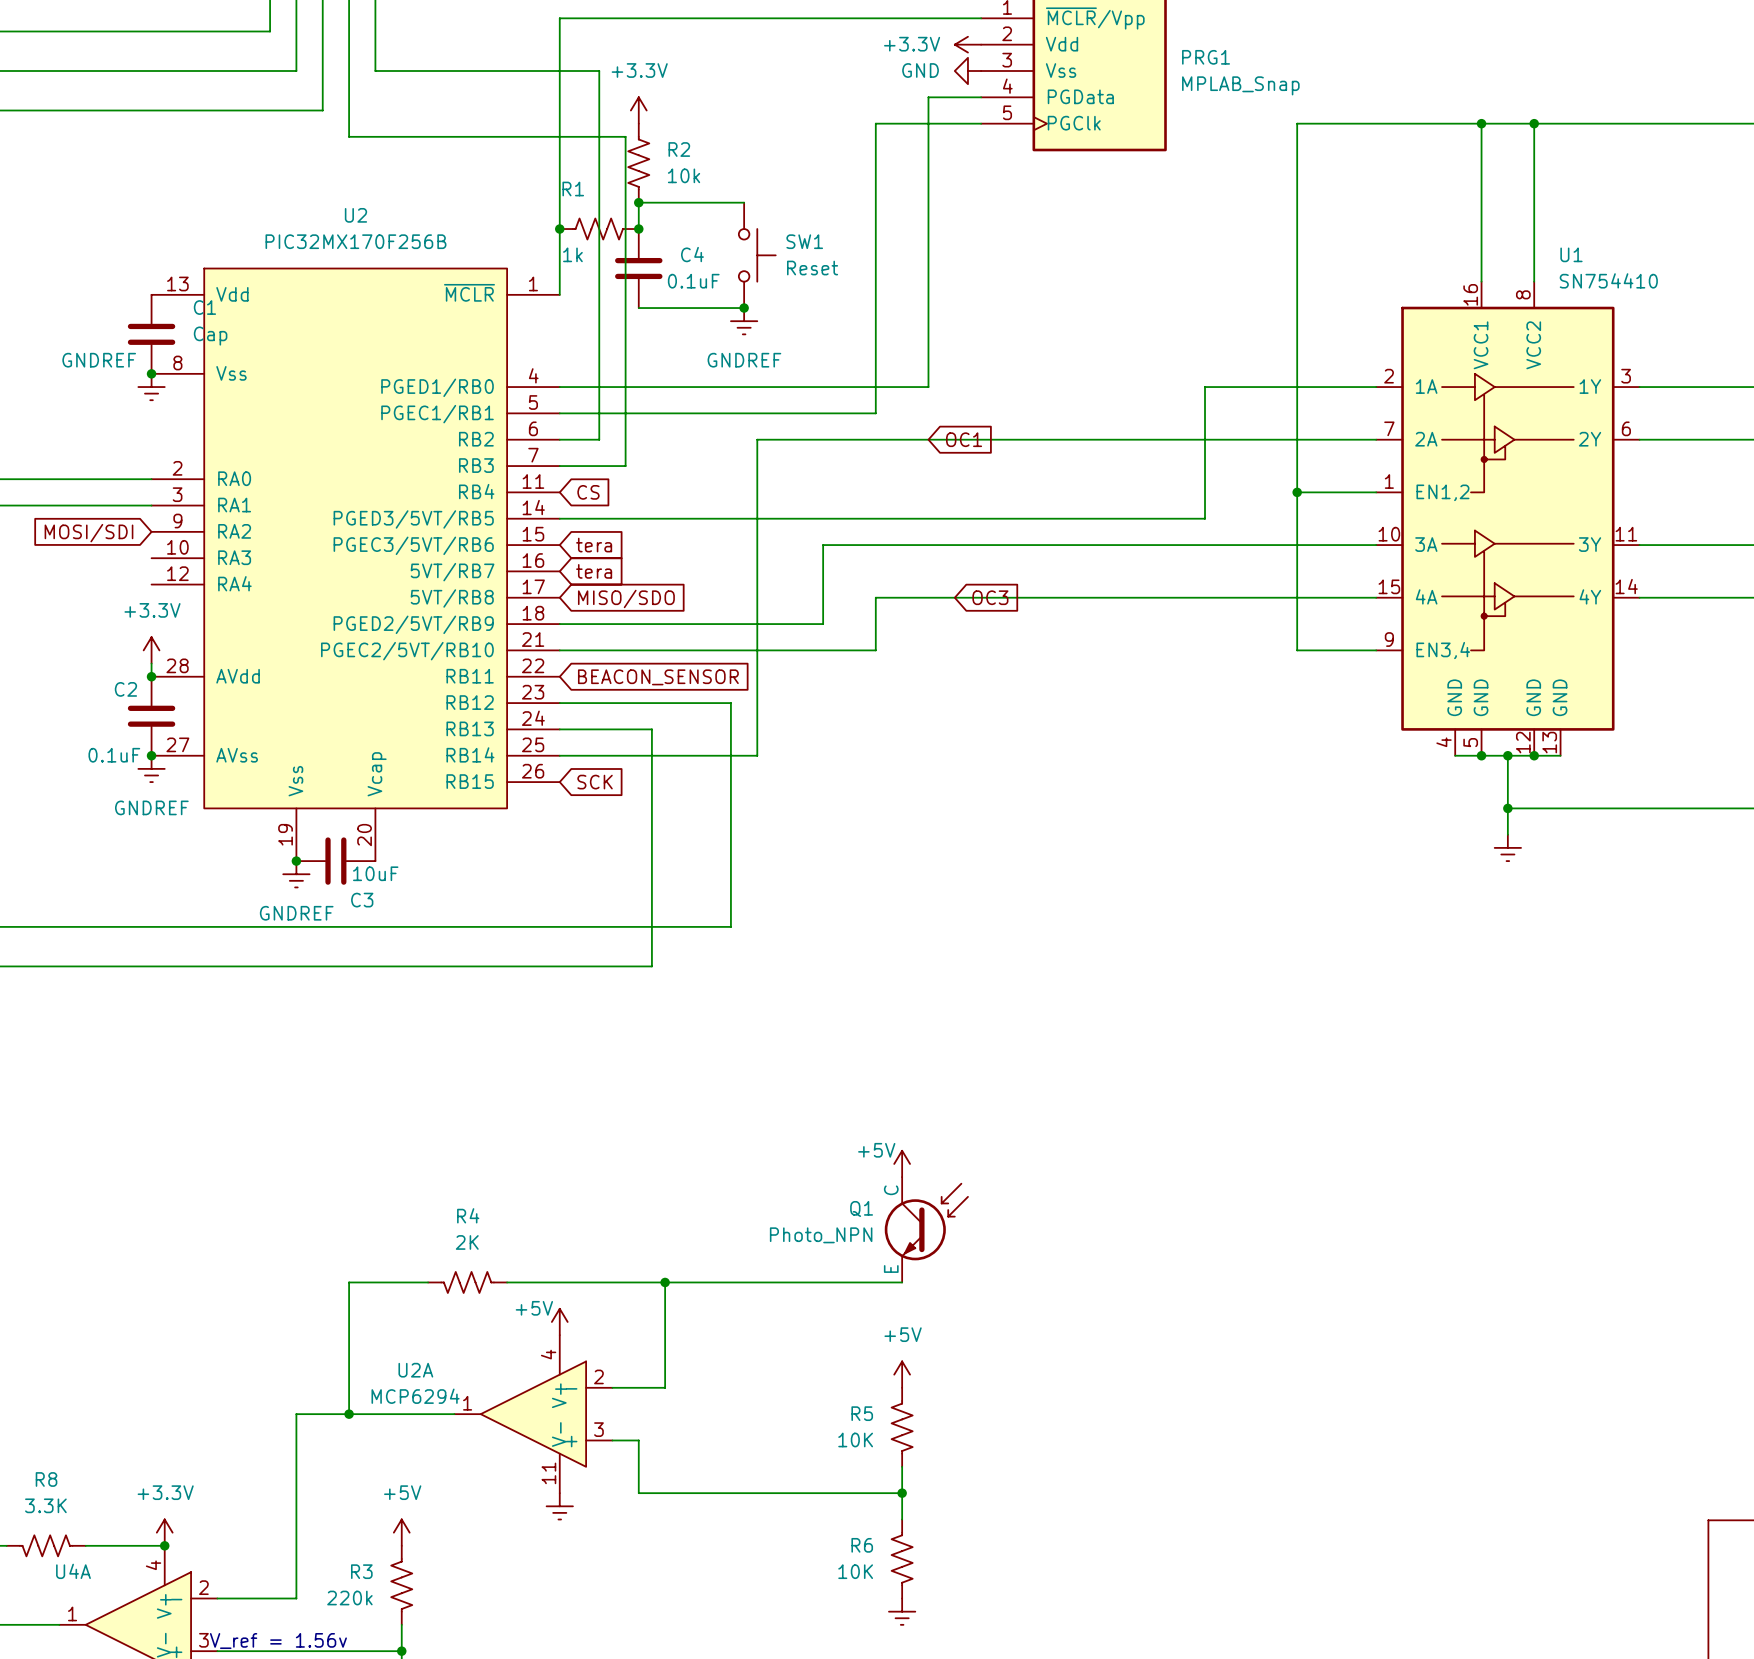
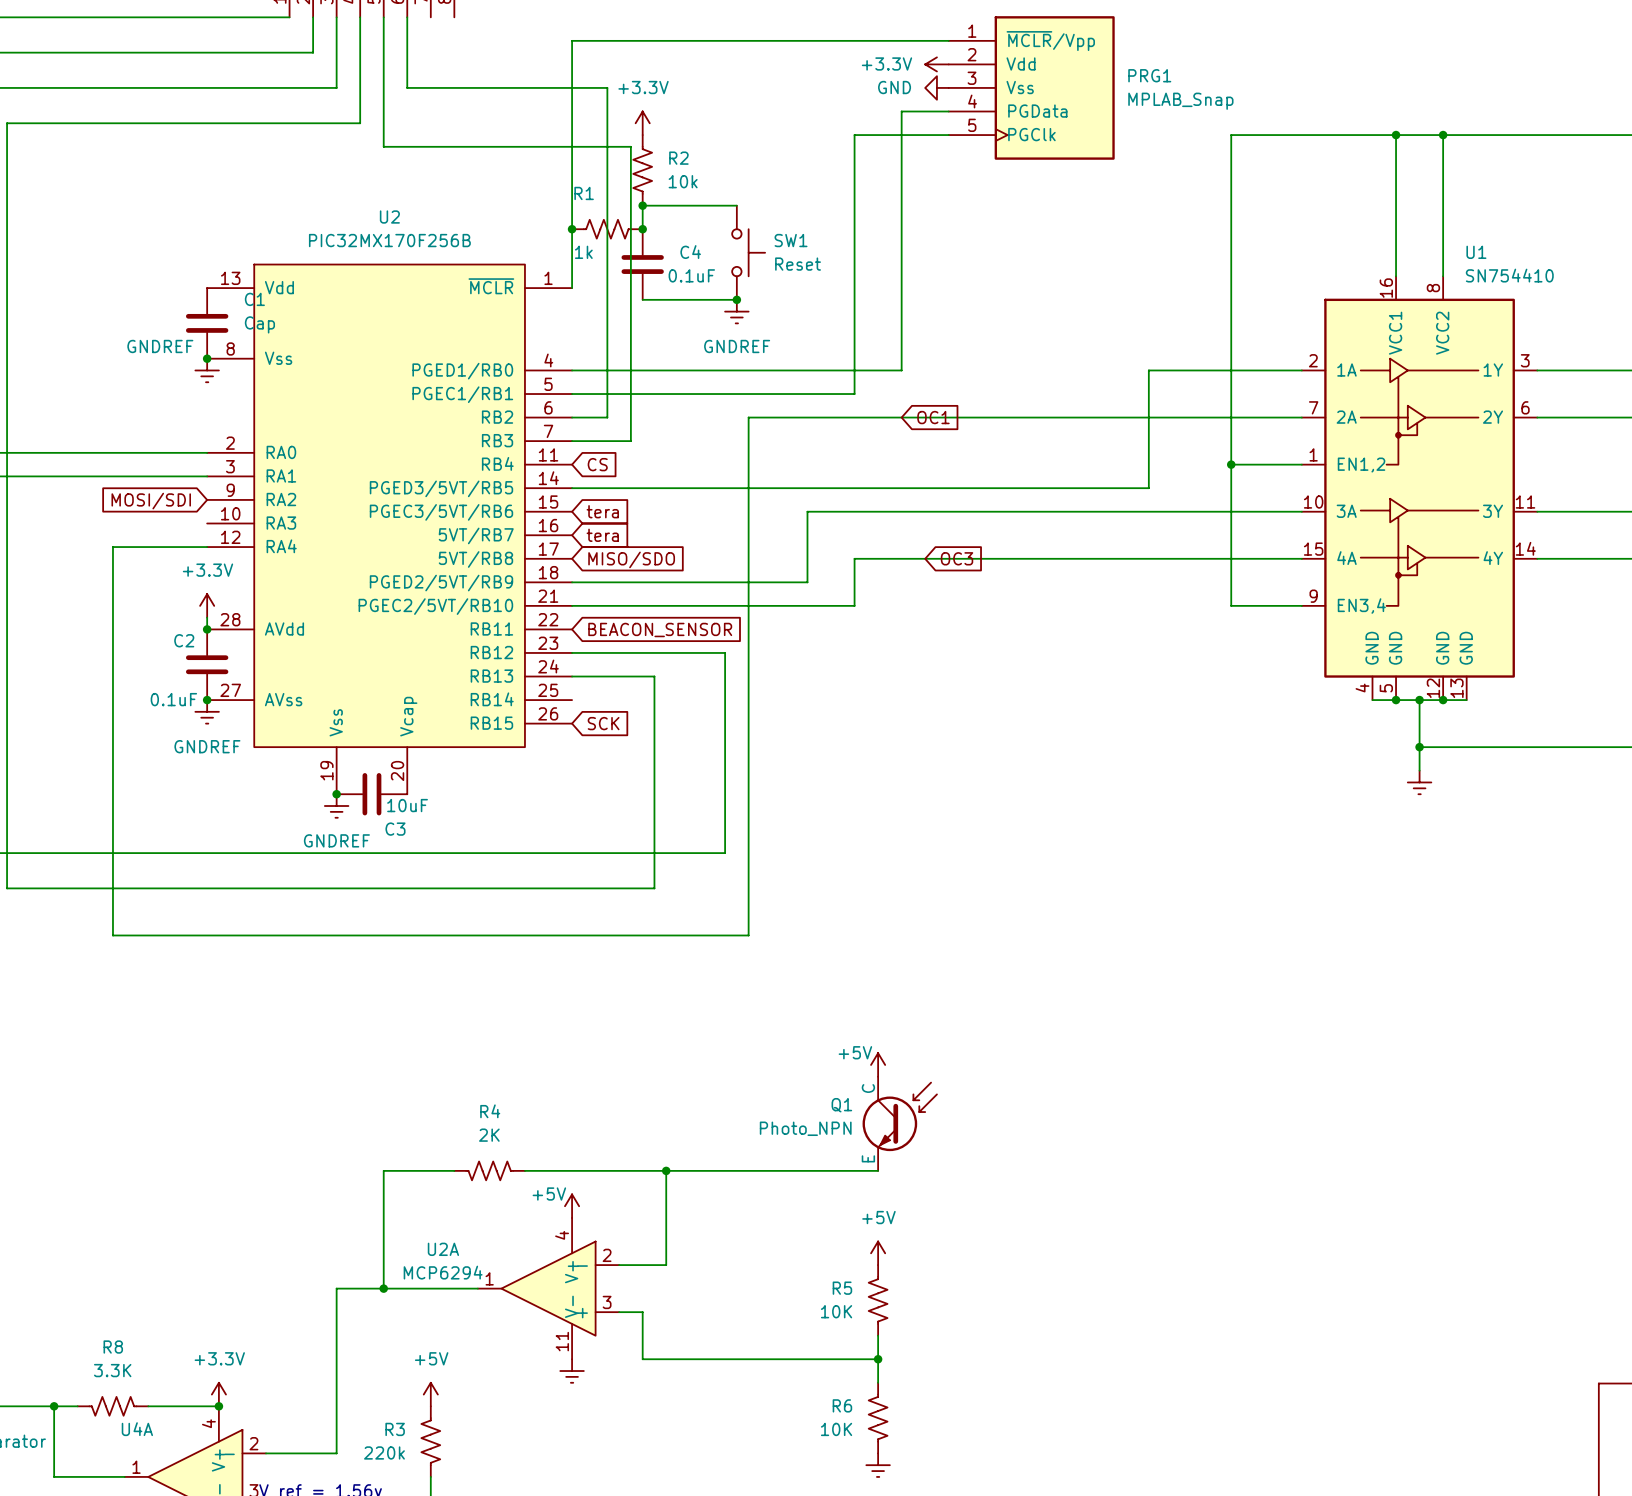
wire: (559, 755) (757, 755) -> (207, 547) (112, 547) (112, 935) (748, 935) (748, 700)

